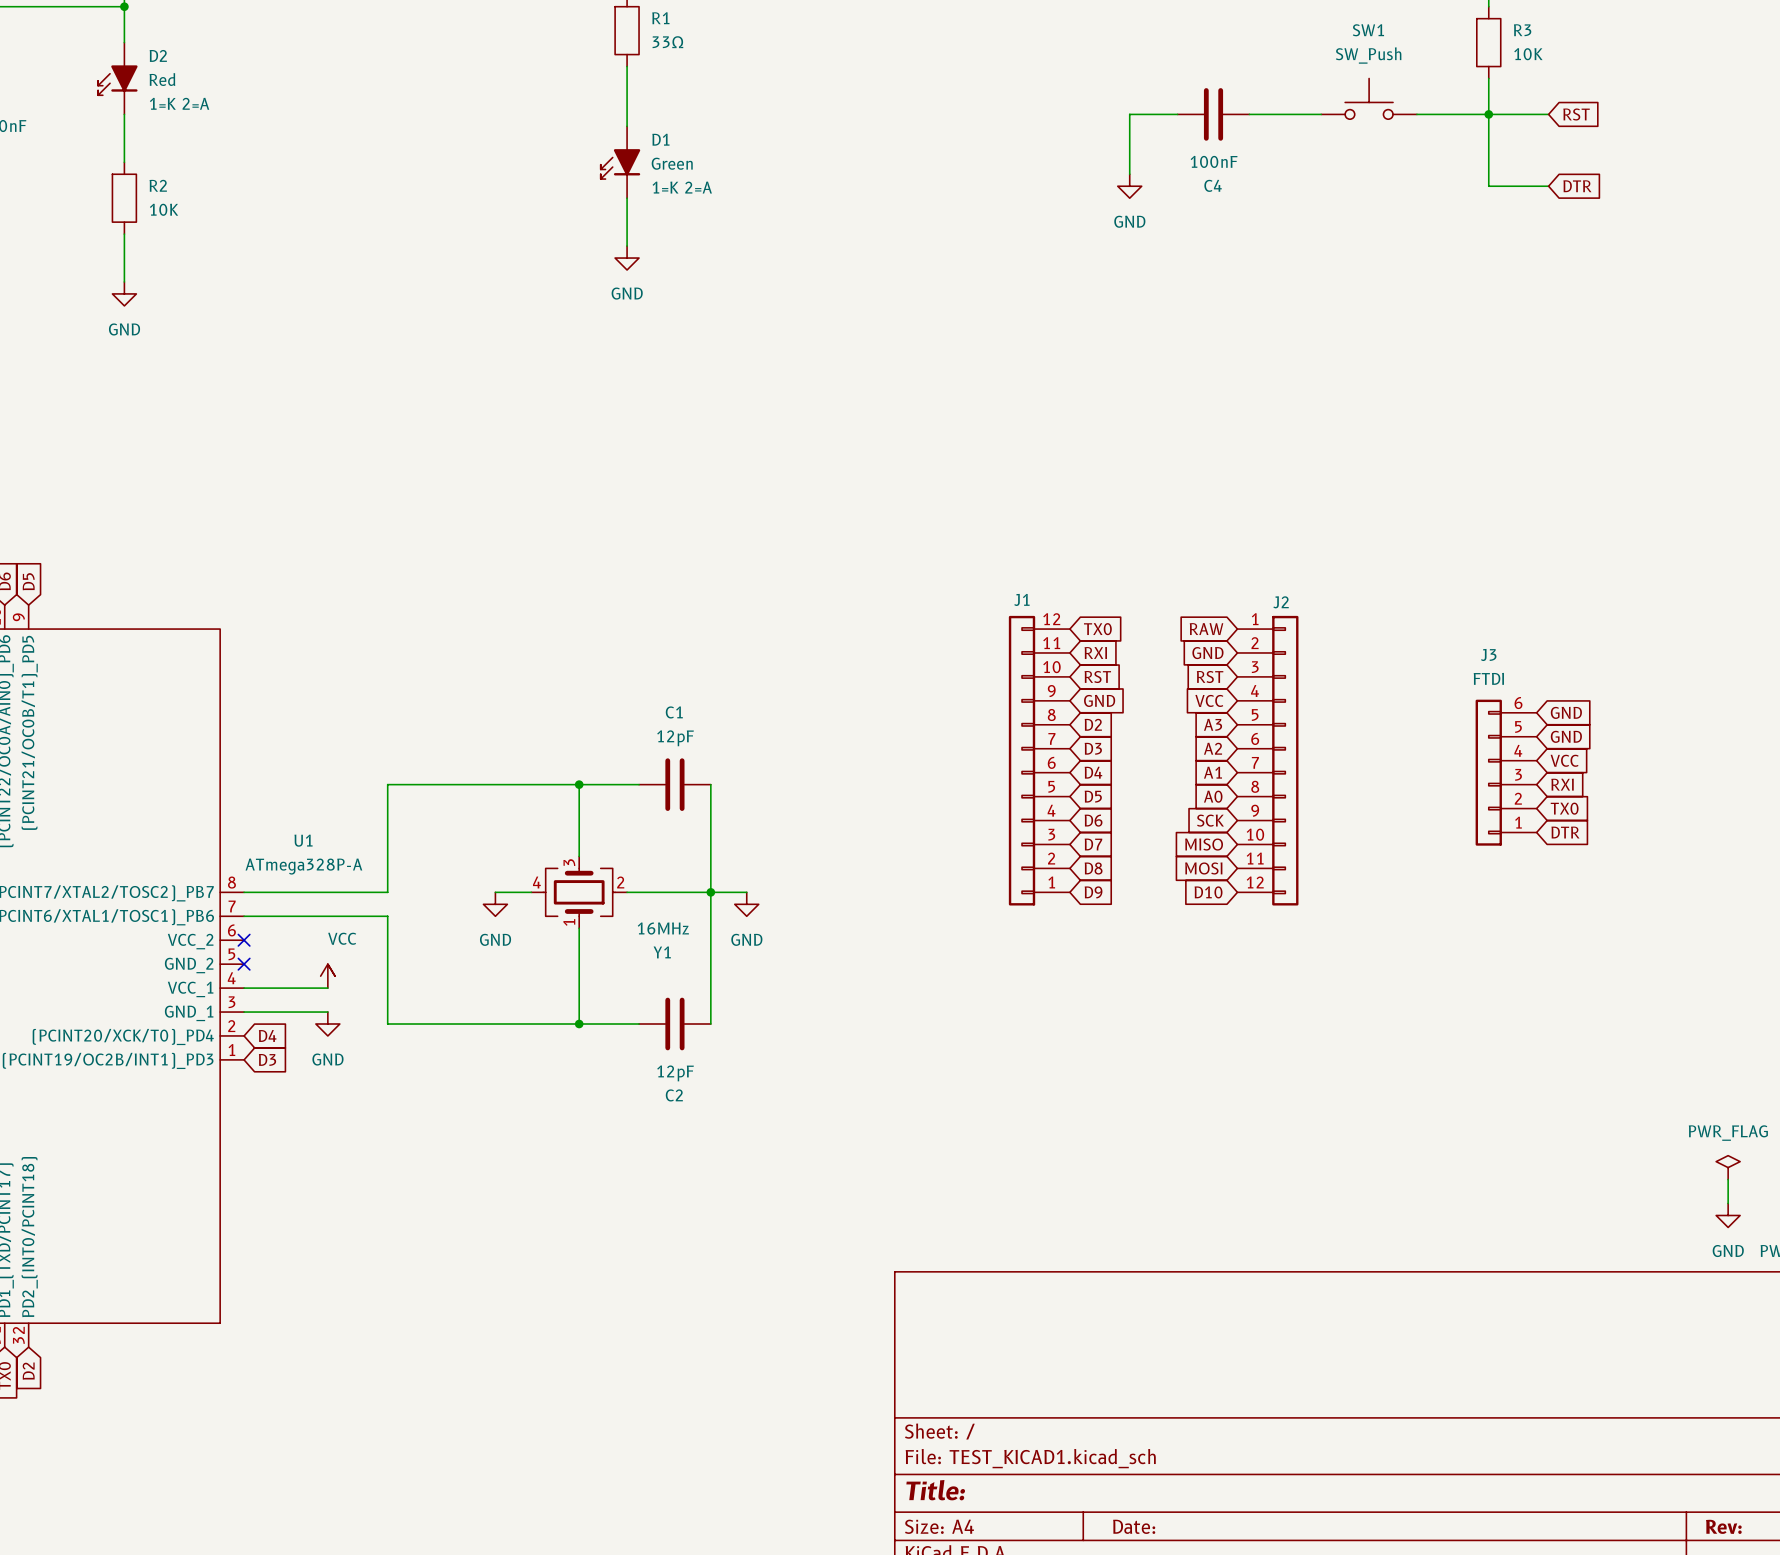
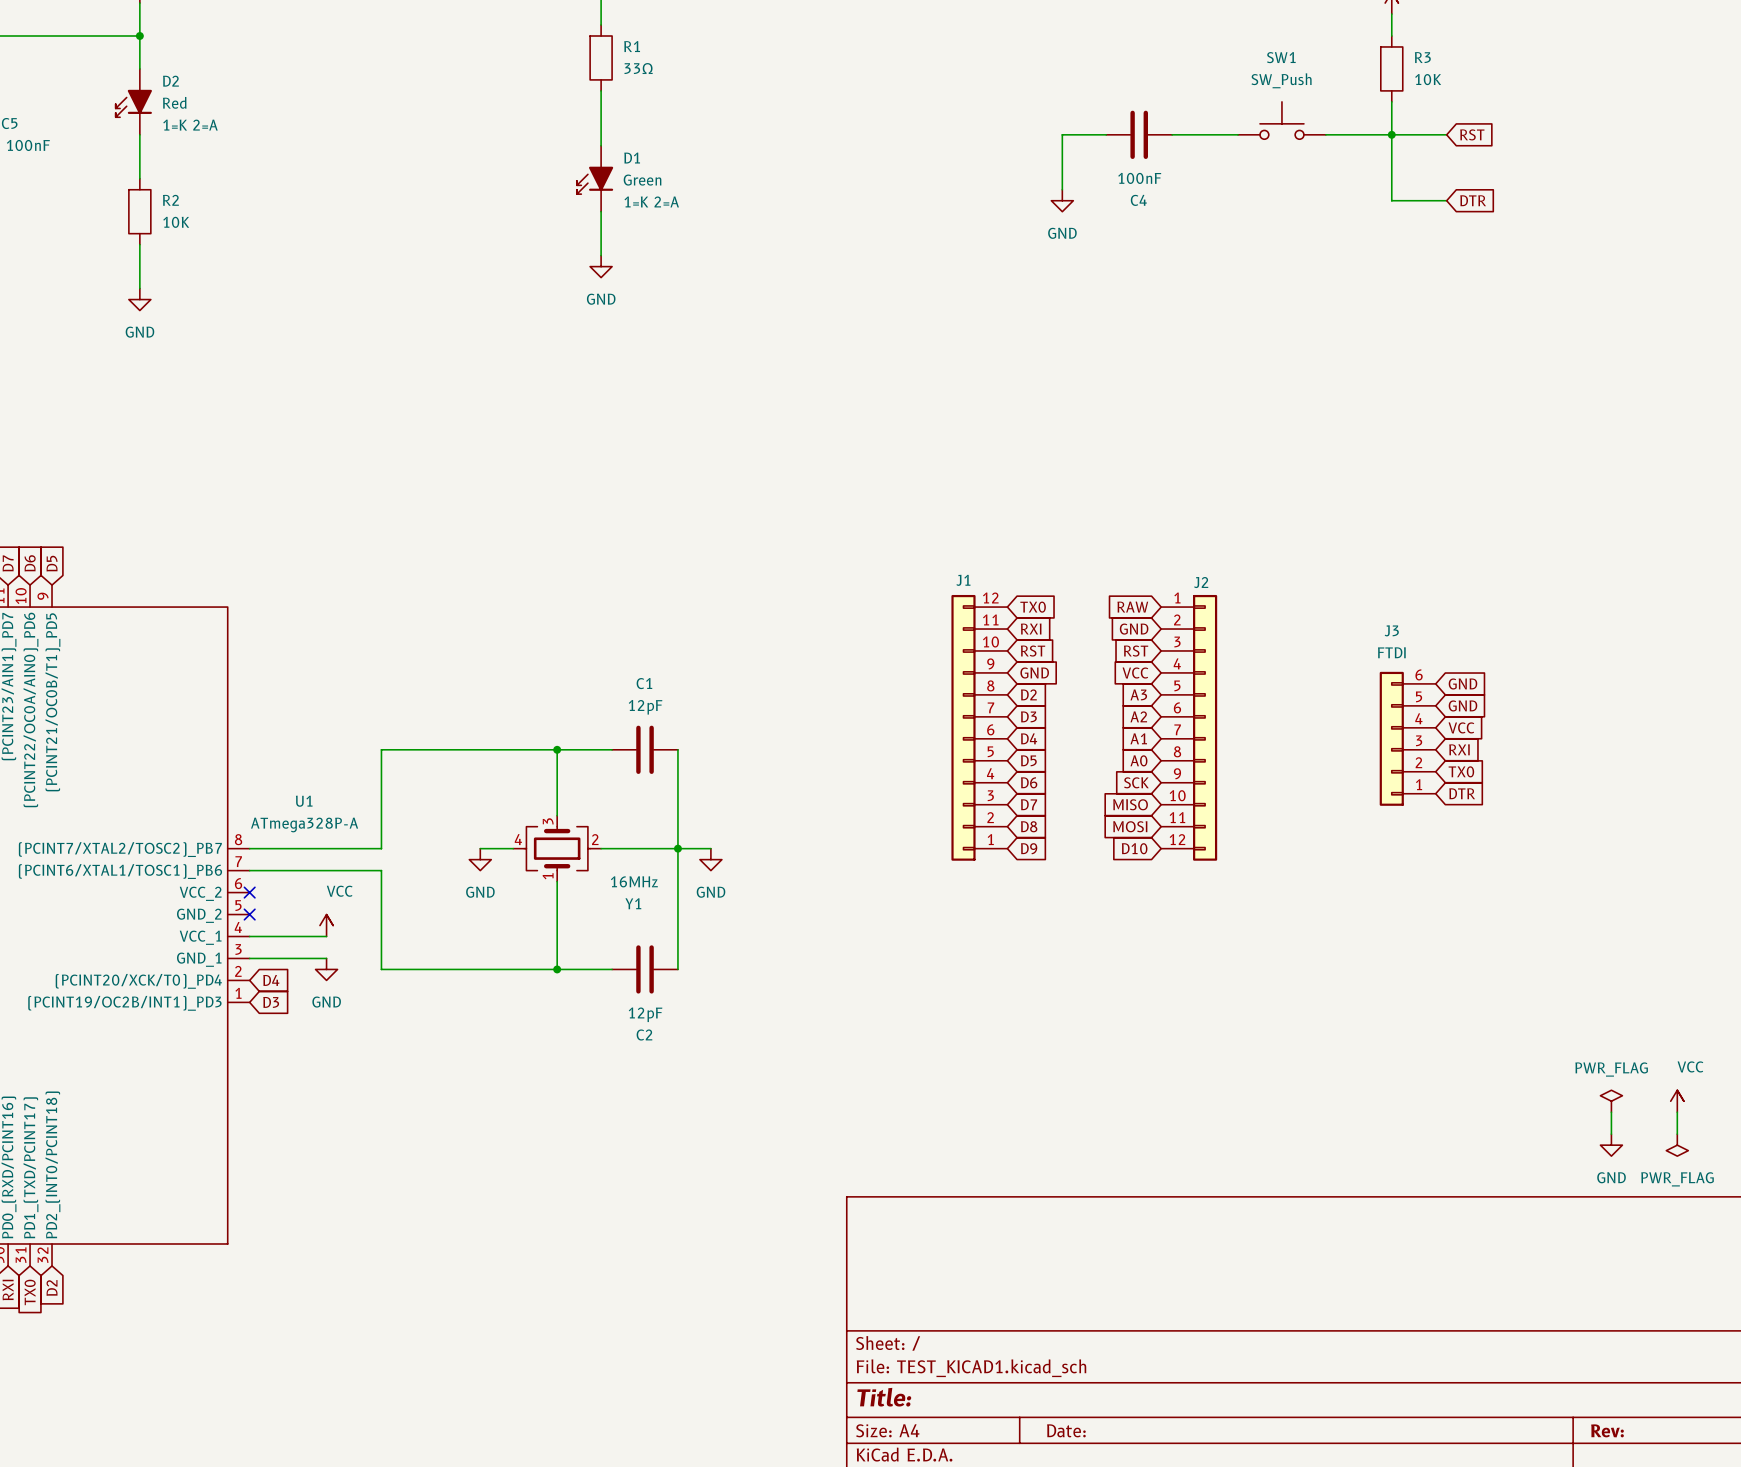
J1 symbol: [1008, 615, 1070, 906] -> [951, 594, 1008, 861]
J2 symbol: [1237, 615, 1299, 906] -> [1161, 594, 1218, 861]
J3 symbol: [1475, 699, 1537, 846] -> [1379, 671, 1436, 806]

